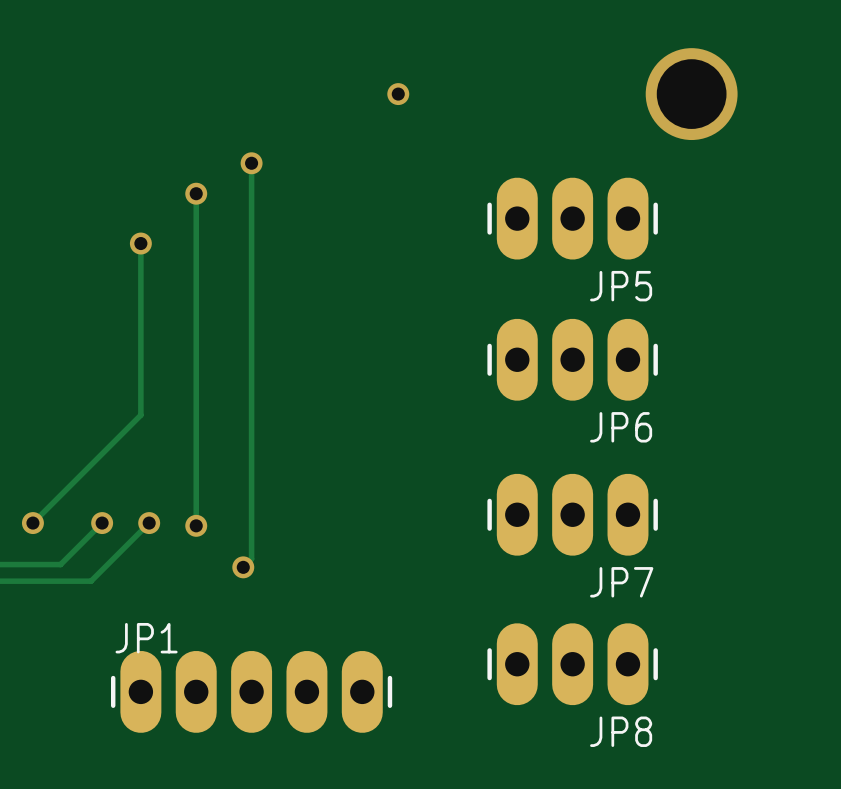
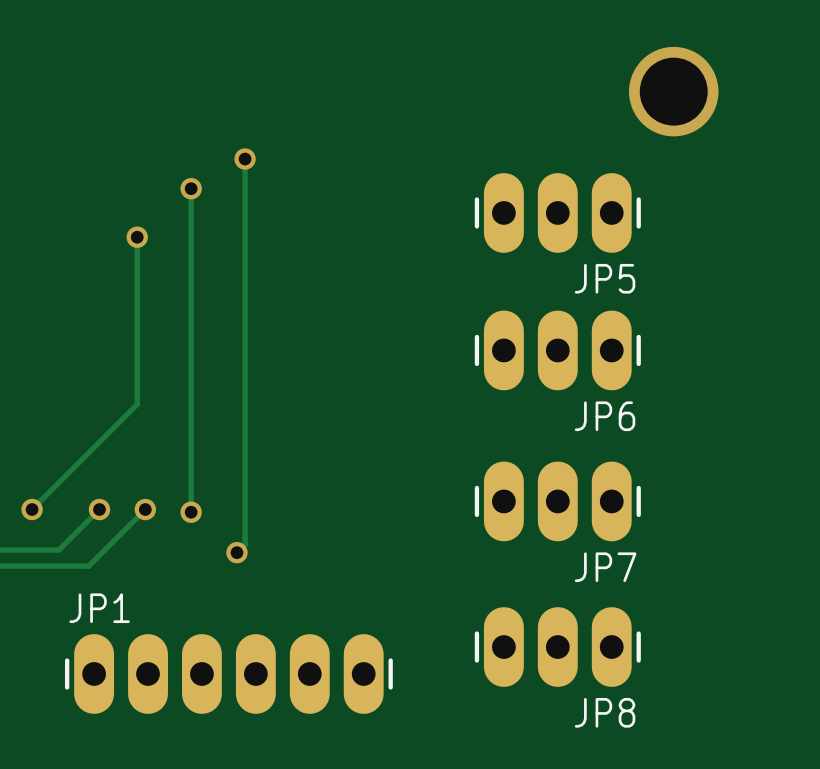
via: (398, 94) -> none
JP1 footprint: [110, 650, 393, 733] -> [64, 634, 393, 714]

